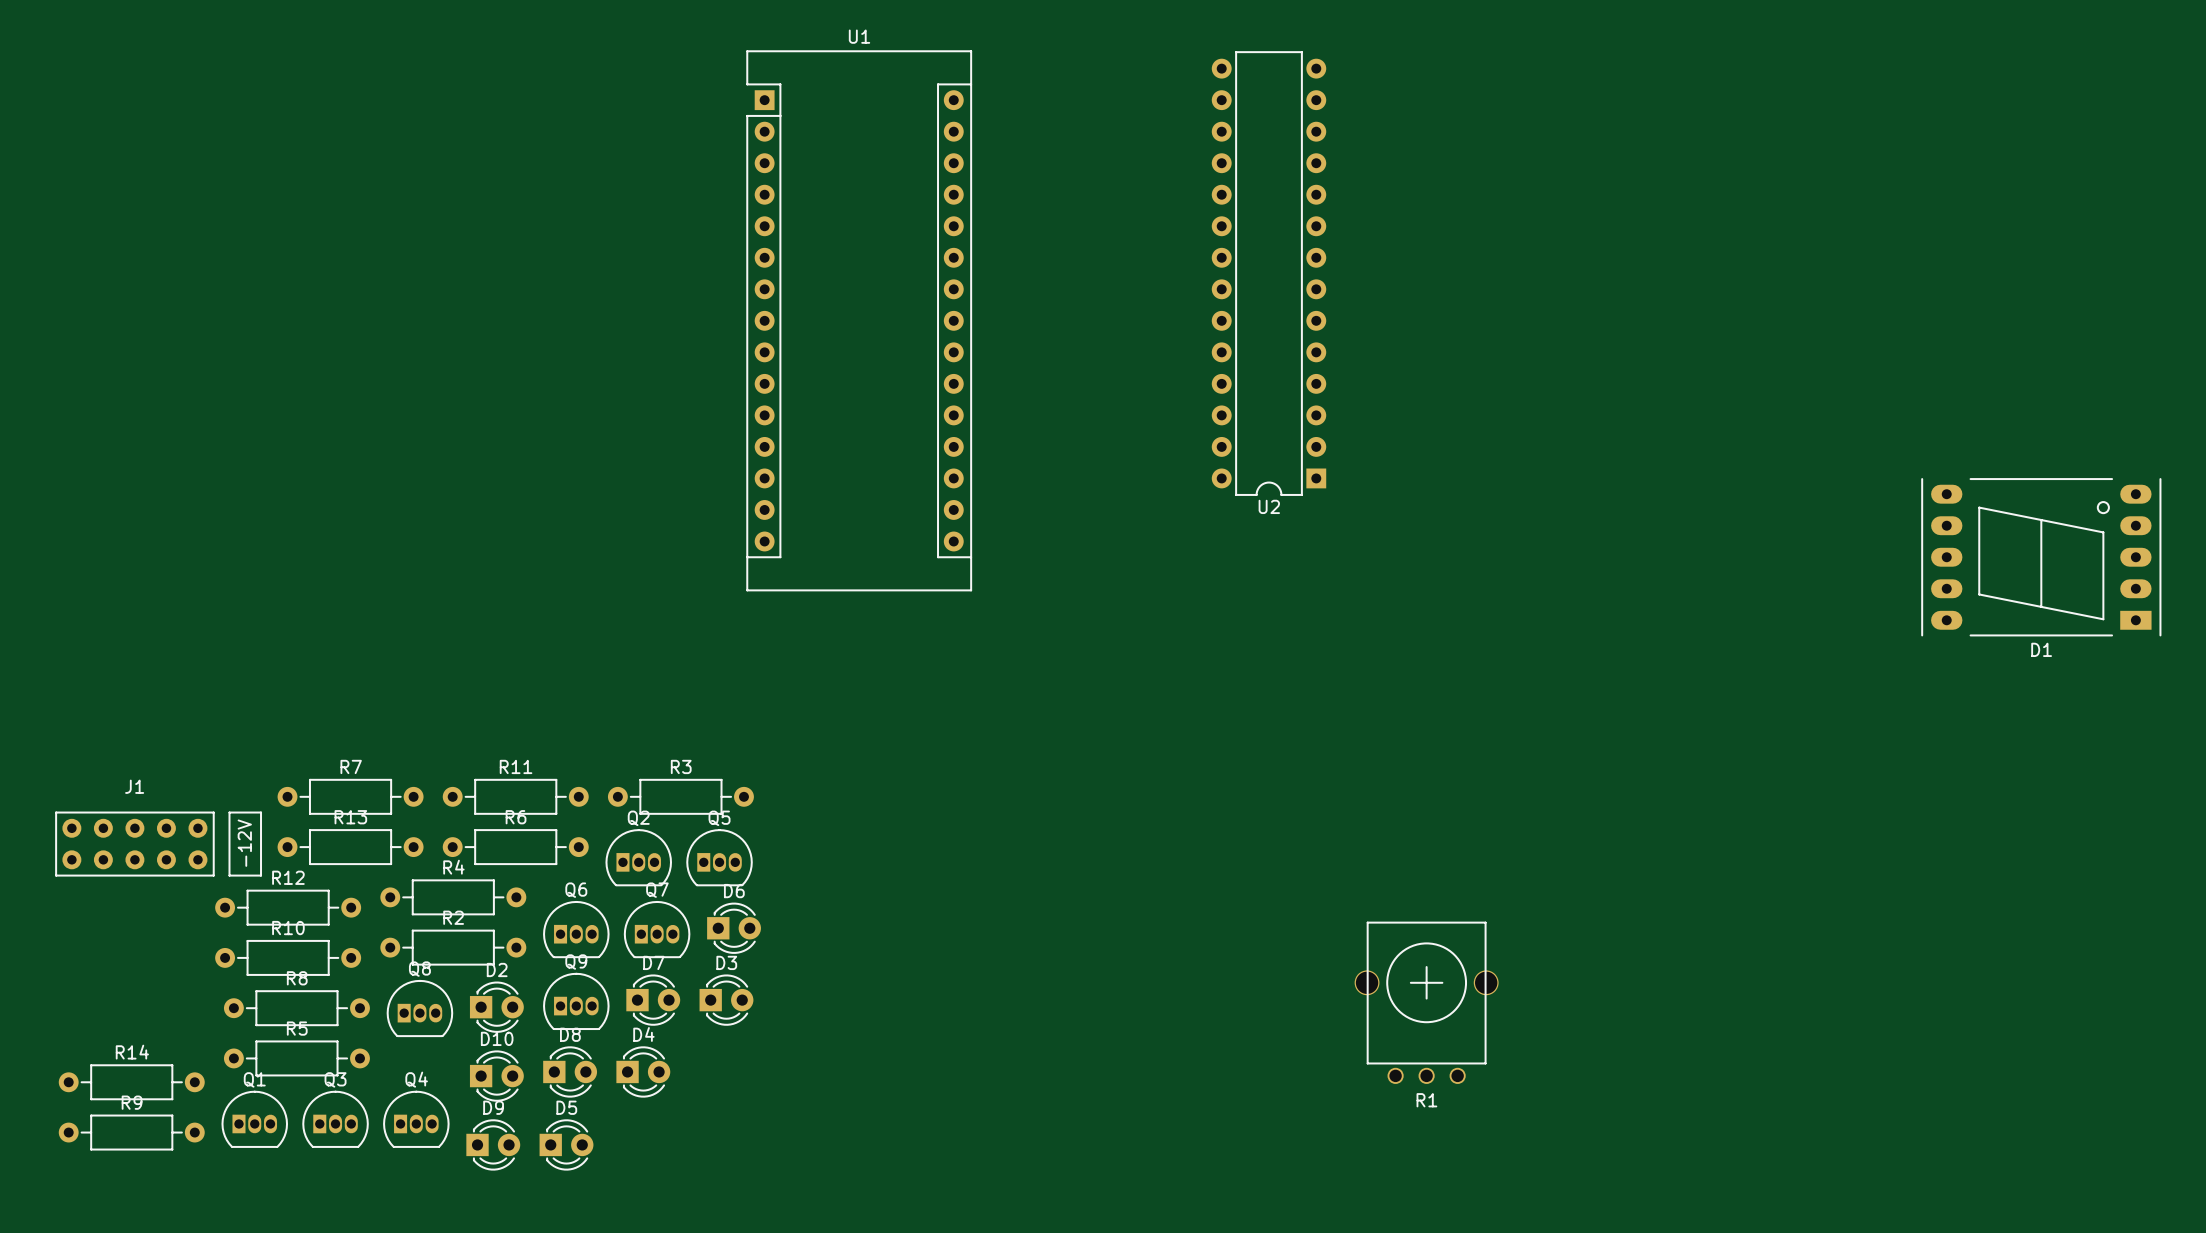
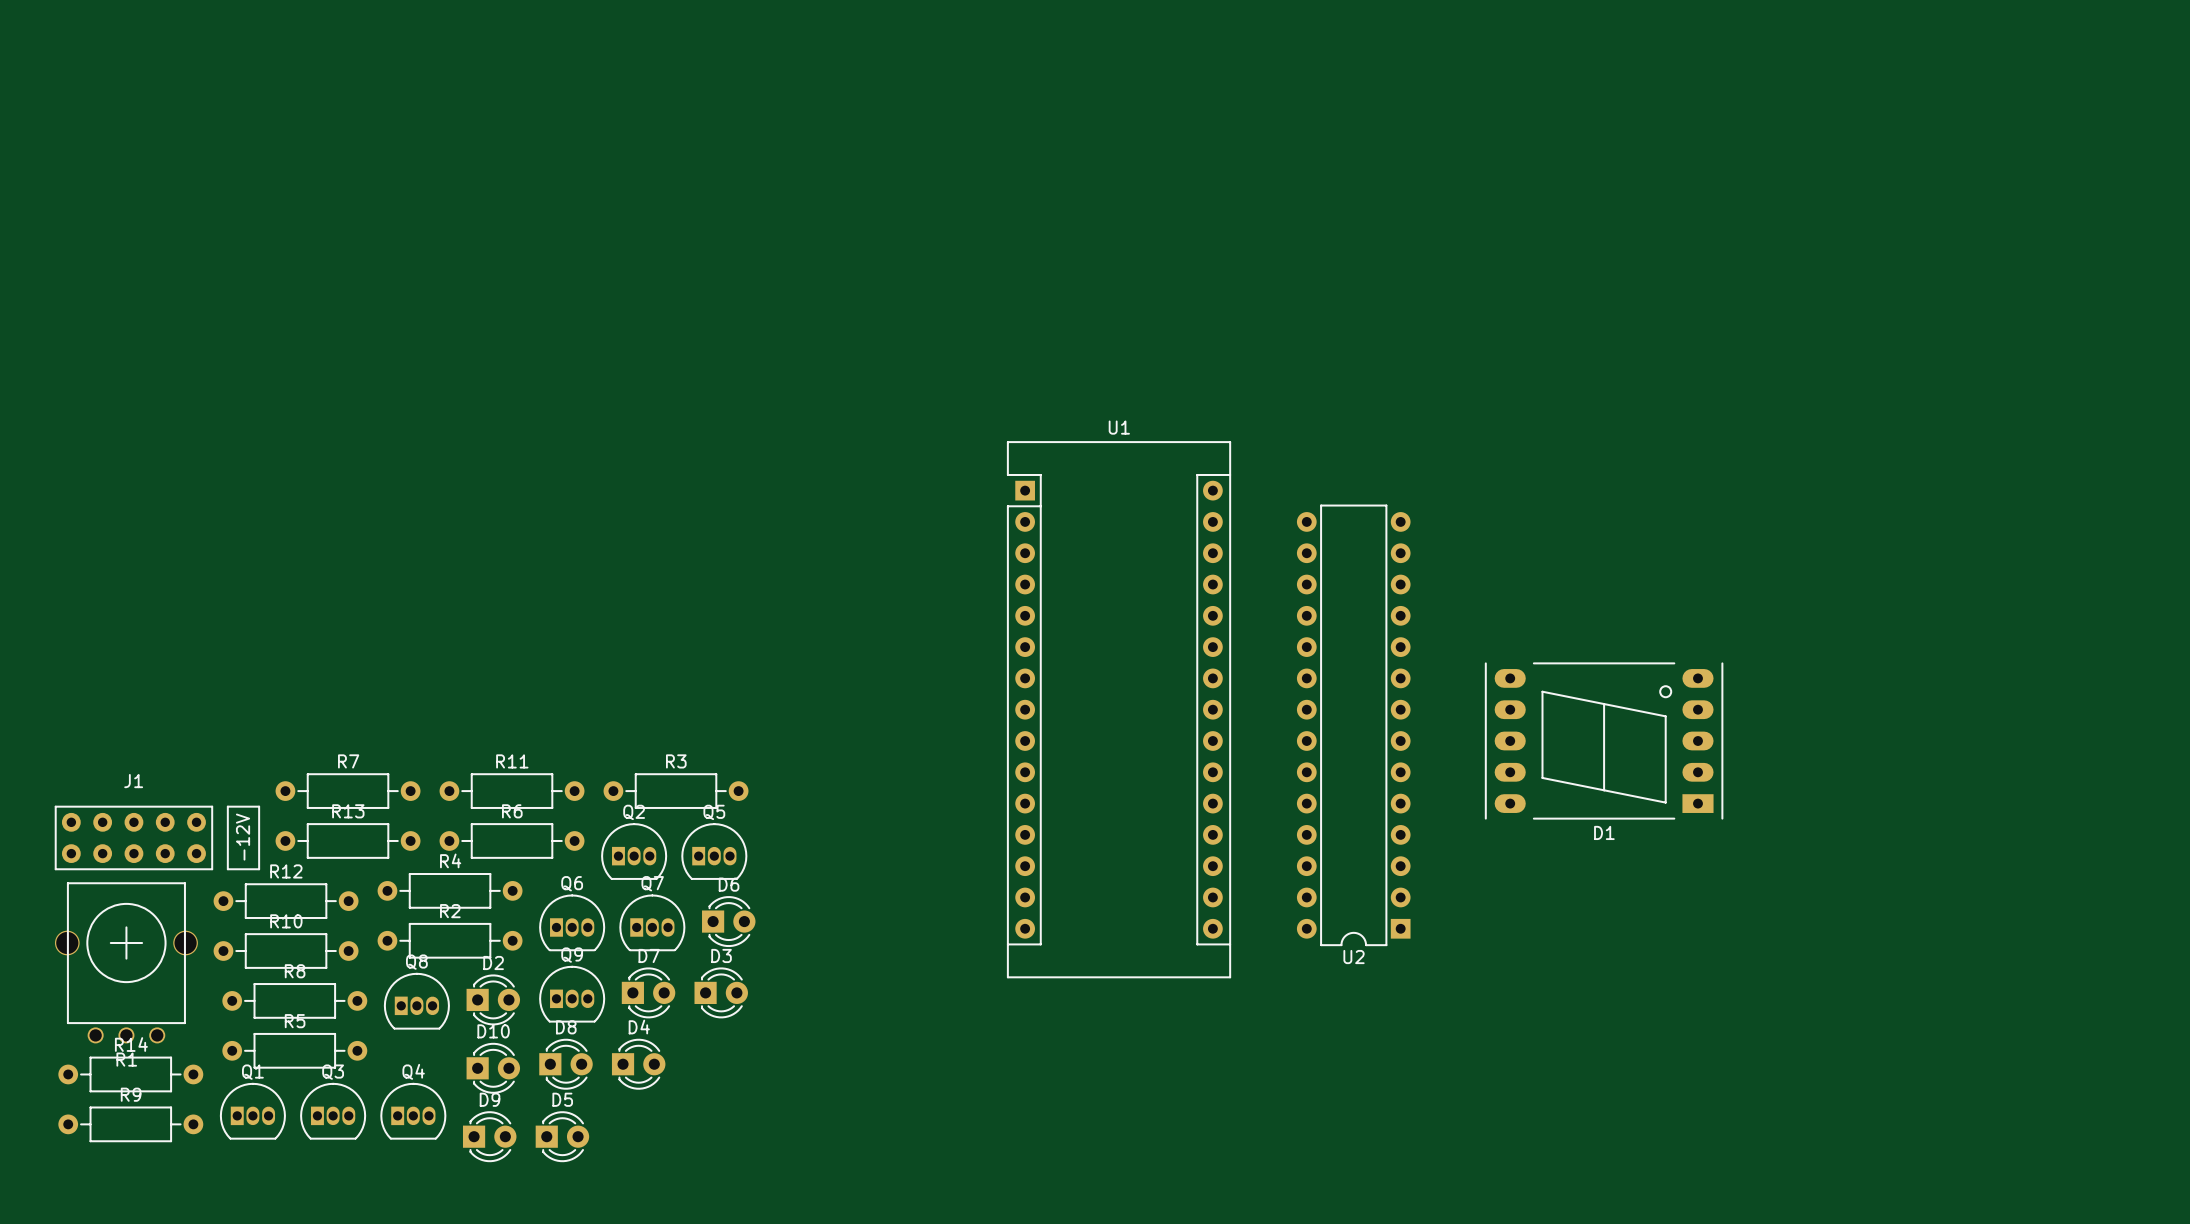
U2 position: (1269, 273) -> (1353, 725)
U1 position: (859, 320) -> (1119, 709)
D1 position: (2041, 557) -> (1604, 741)
R1 position: (1426, 1002) -> (126, 962)

